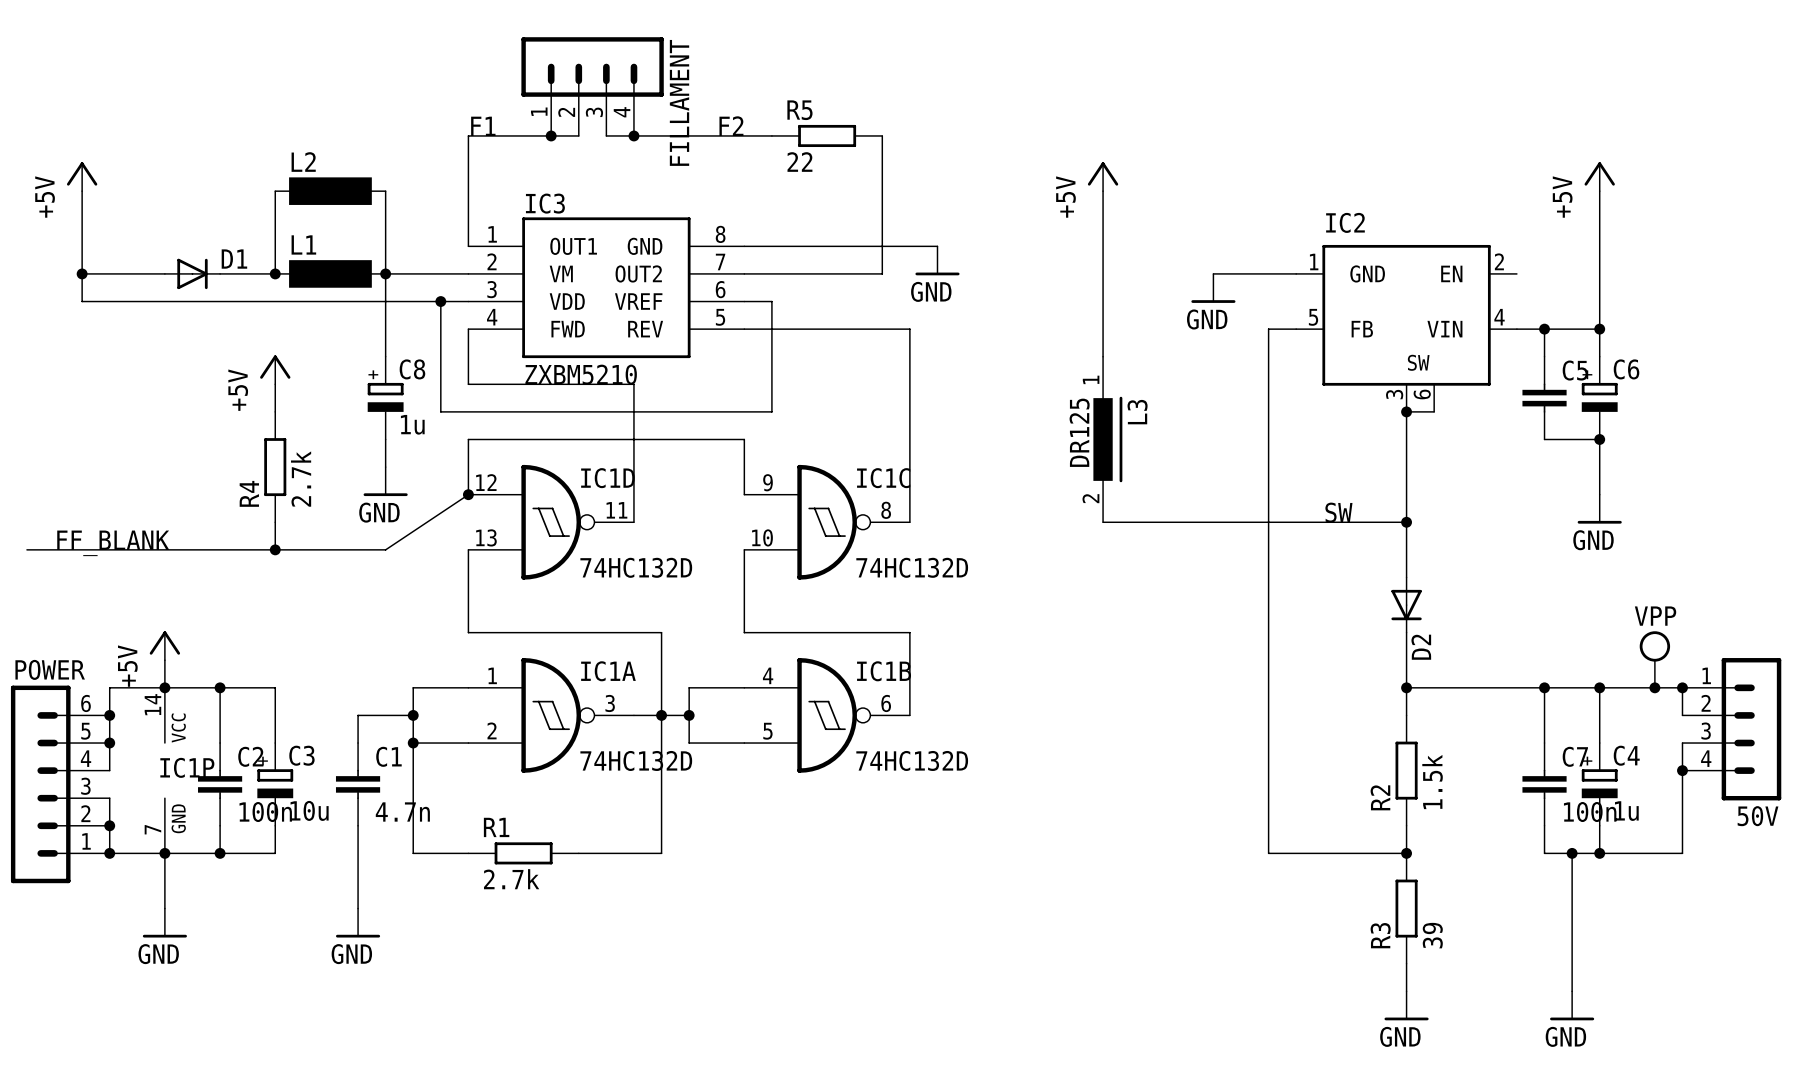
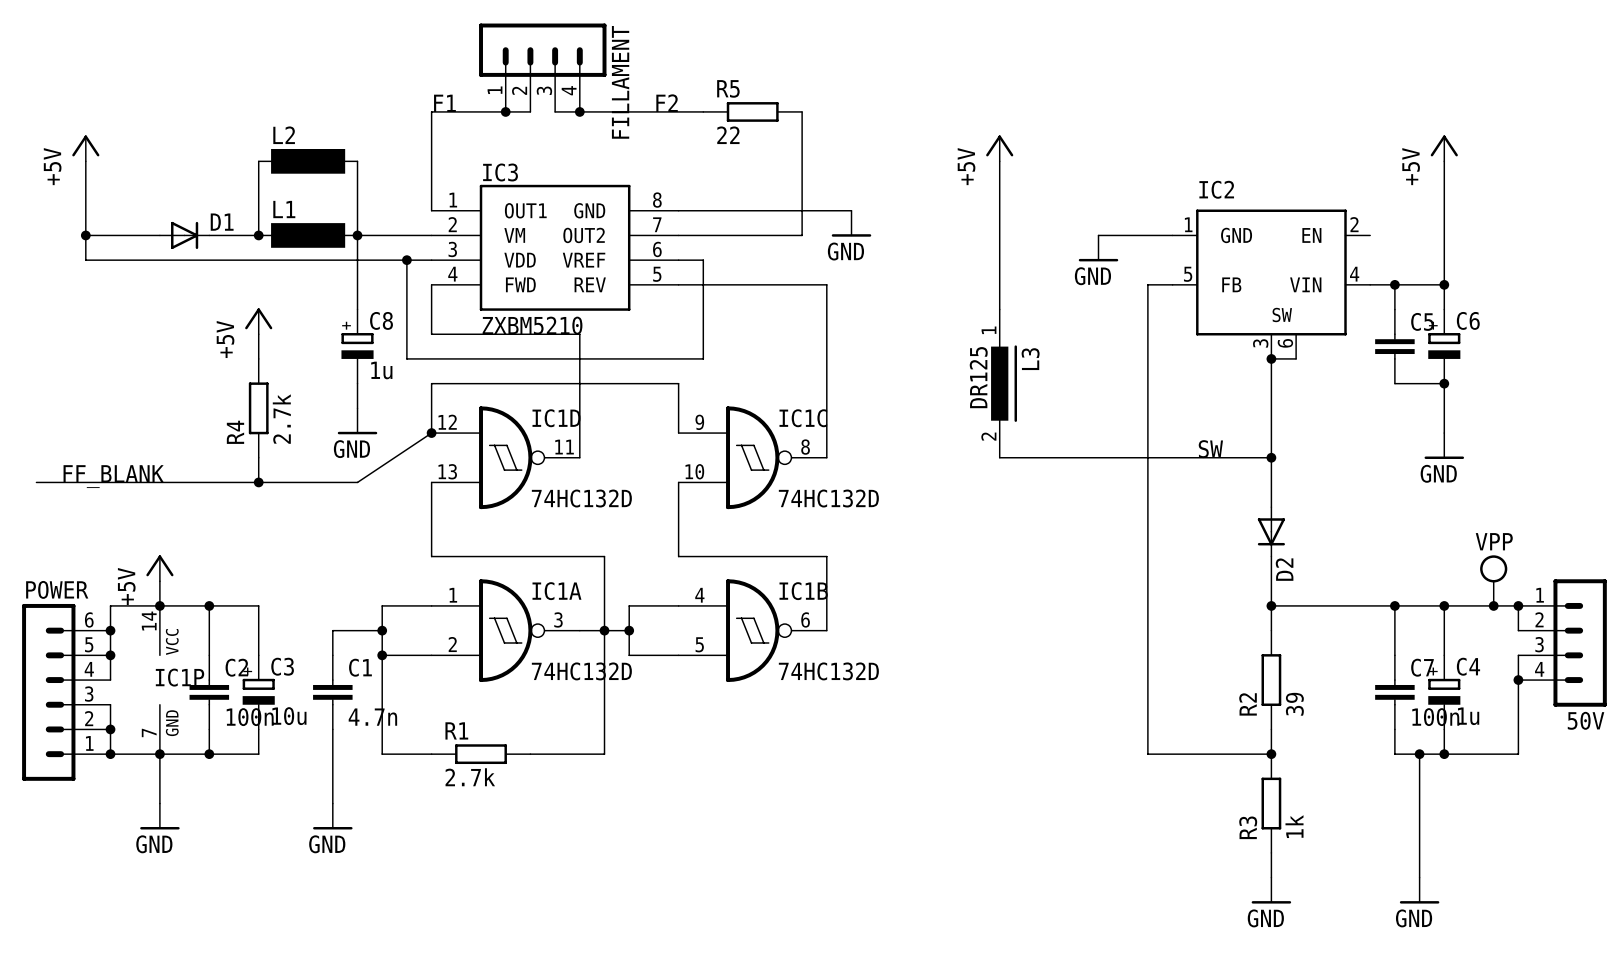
R2 value: 1.5k (1432, 782) -> 39 (1294, 704)
R3 value: 39 (1432, 935) -> 1k (1294, 826)

